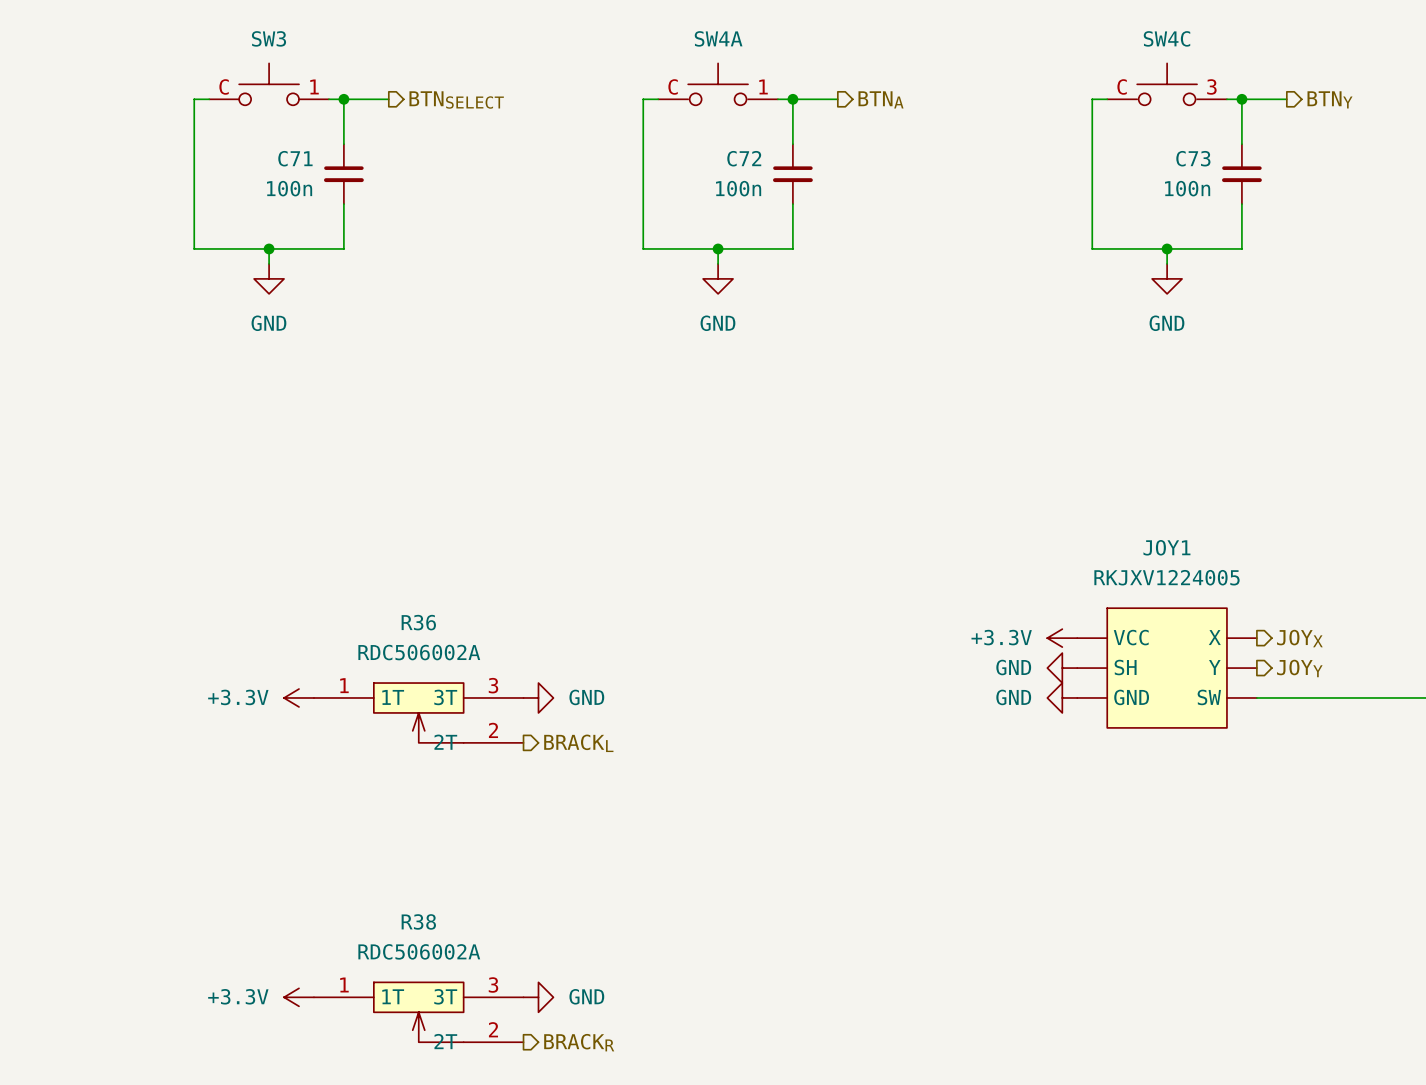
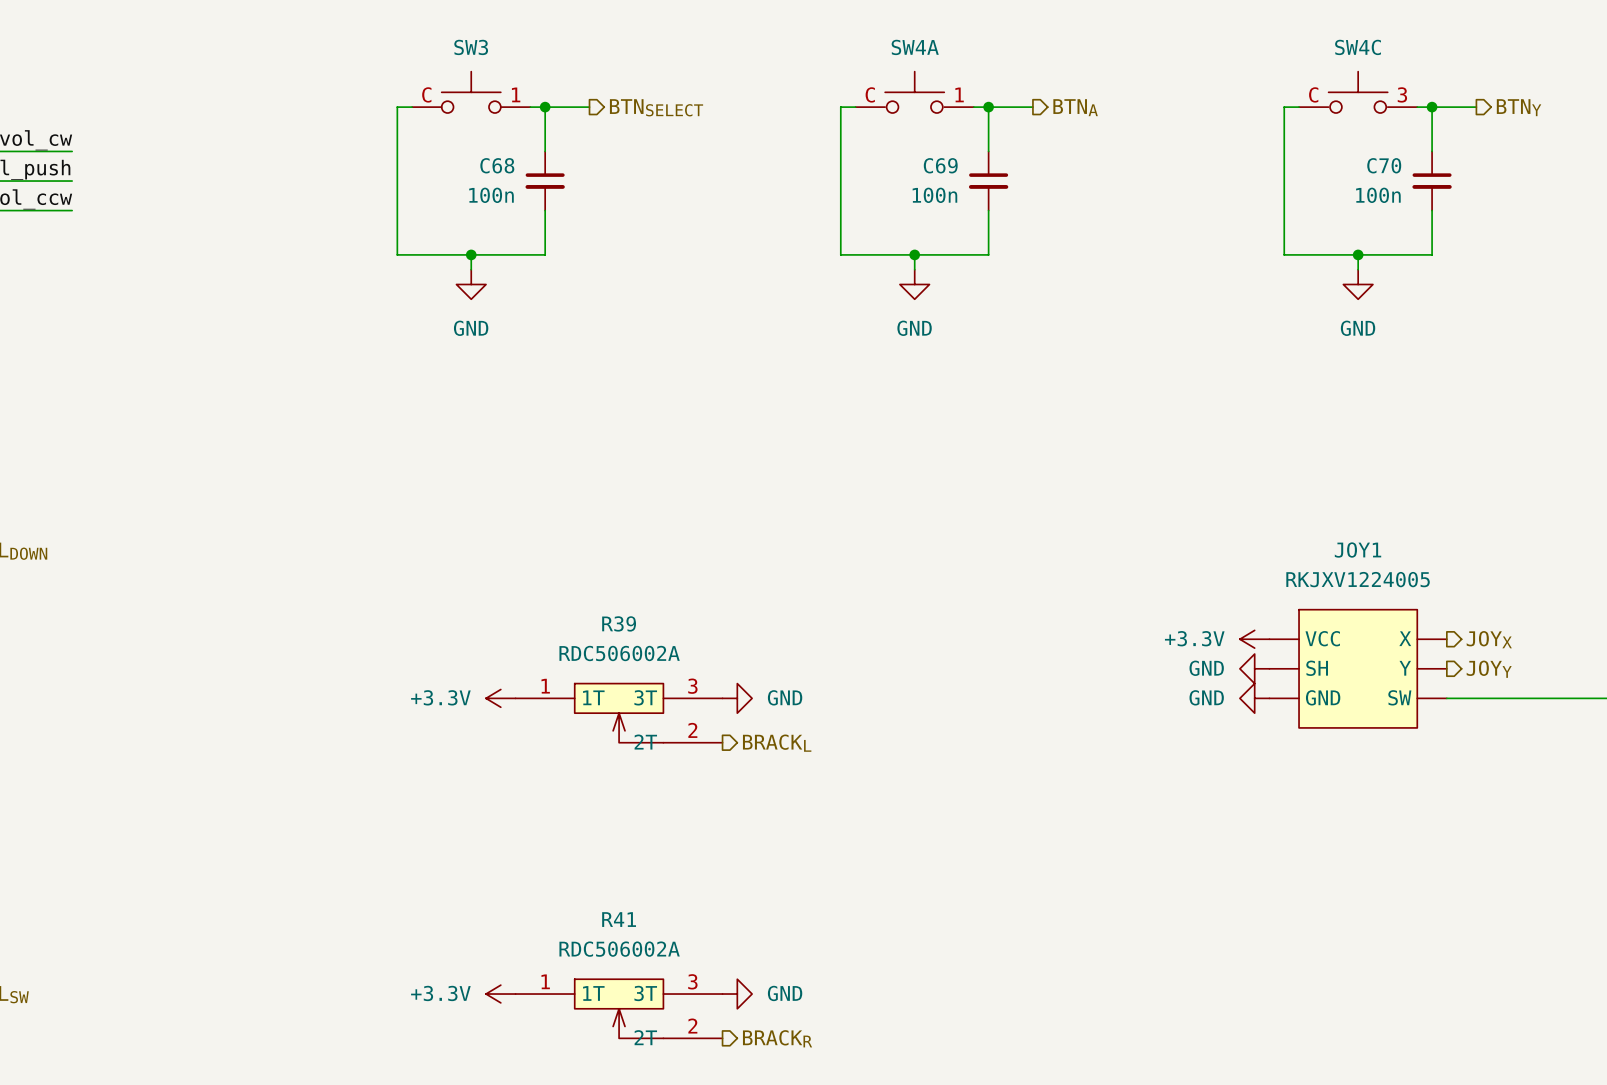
C71 name: C71 (295, 158) -> C68 (497, 165)
C72 name: C72 (744, 158) -> C69 (940, 165)
C73 name: C73 (1193, 158) -> C70 (1384, 165)
R36 name: R36 (418, 622) -> R39 (619, 623)
R38 name: R38 (418, 921) -> R41 (619, 919)

